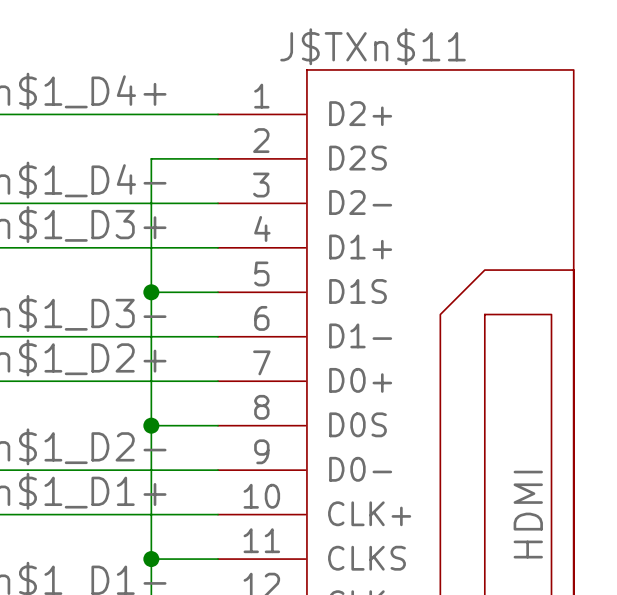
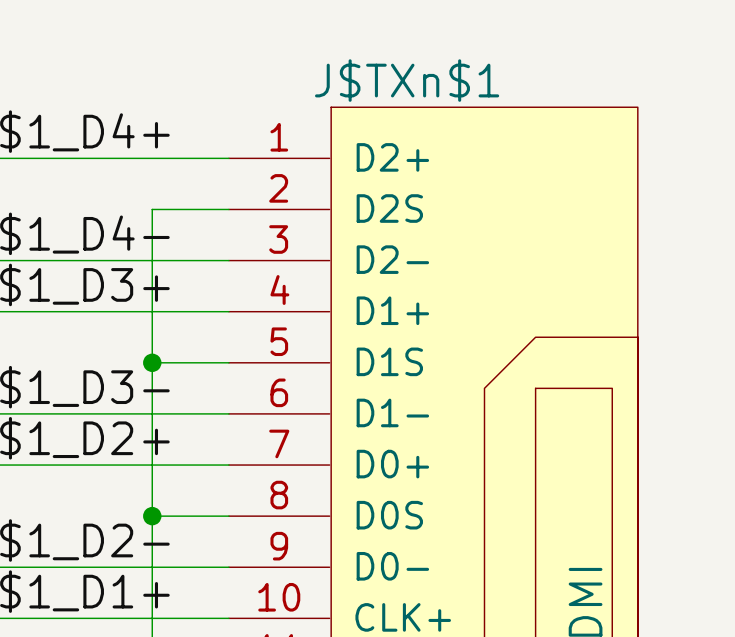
J$TXn$11 name: J$TXn$11 (373, 46) -> J$TXn$1 (407, 80)

